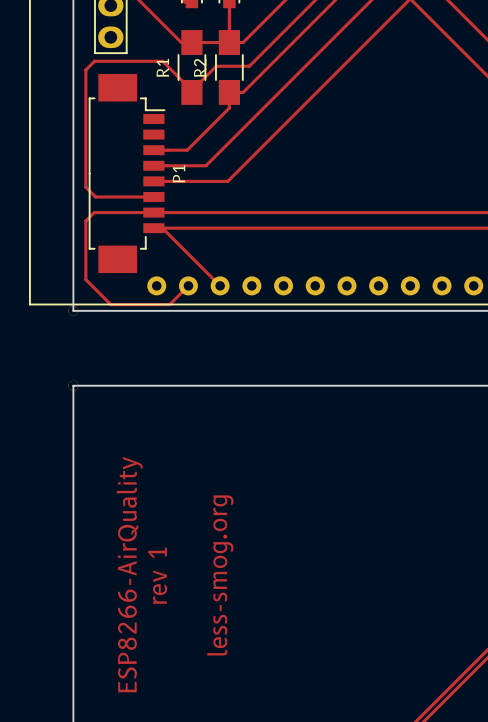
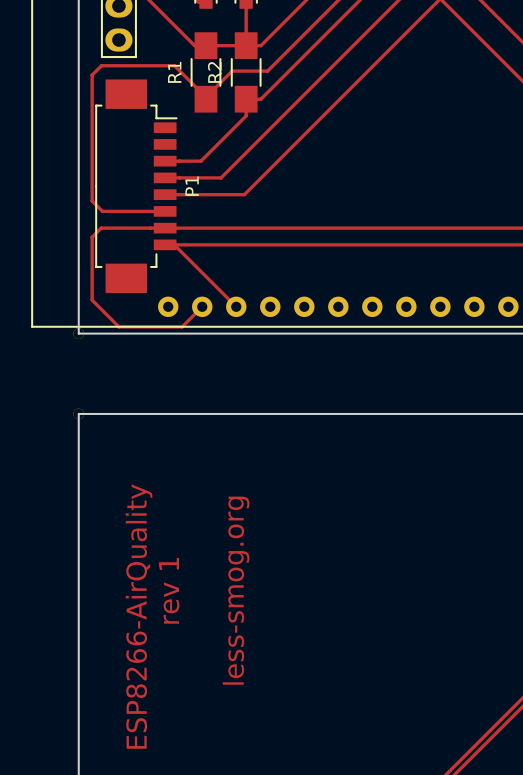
text position: rev 1 (157, 575) -> rev 1 (169, 590)
text position: less-smog.org (220, 575) -> less-smog.org (236, 590)

